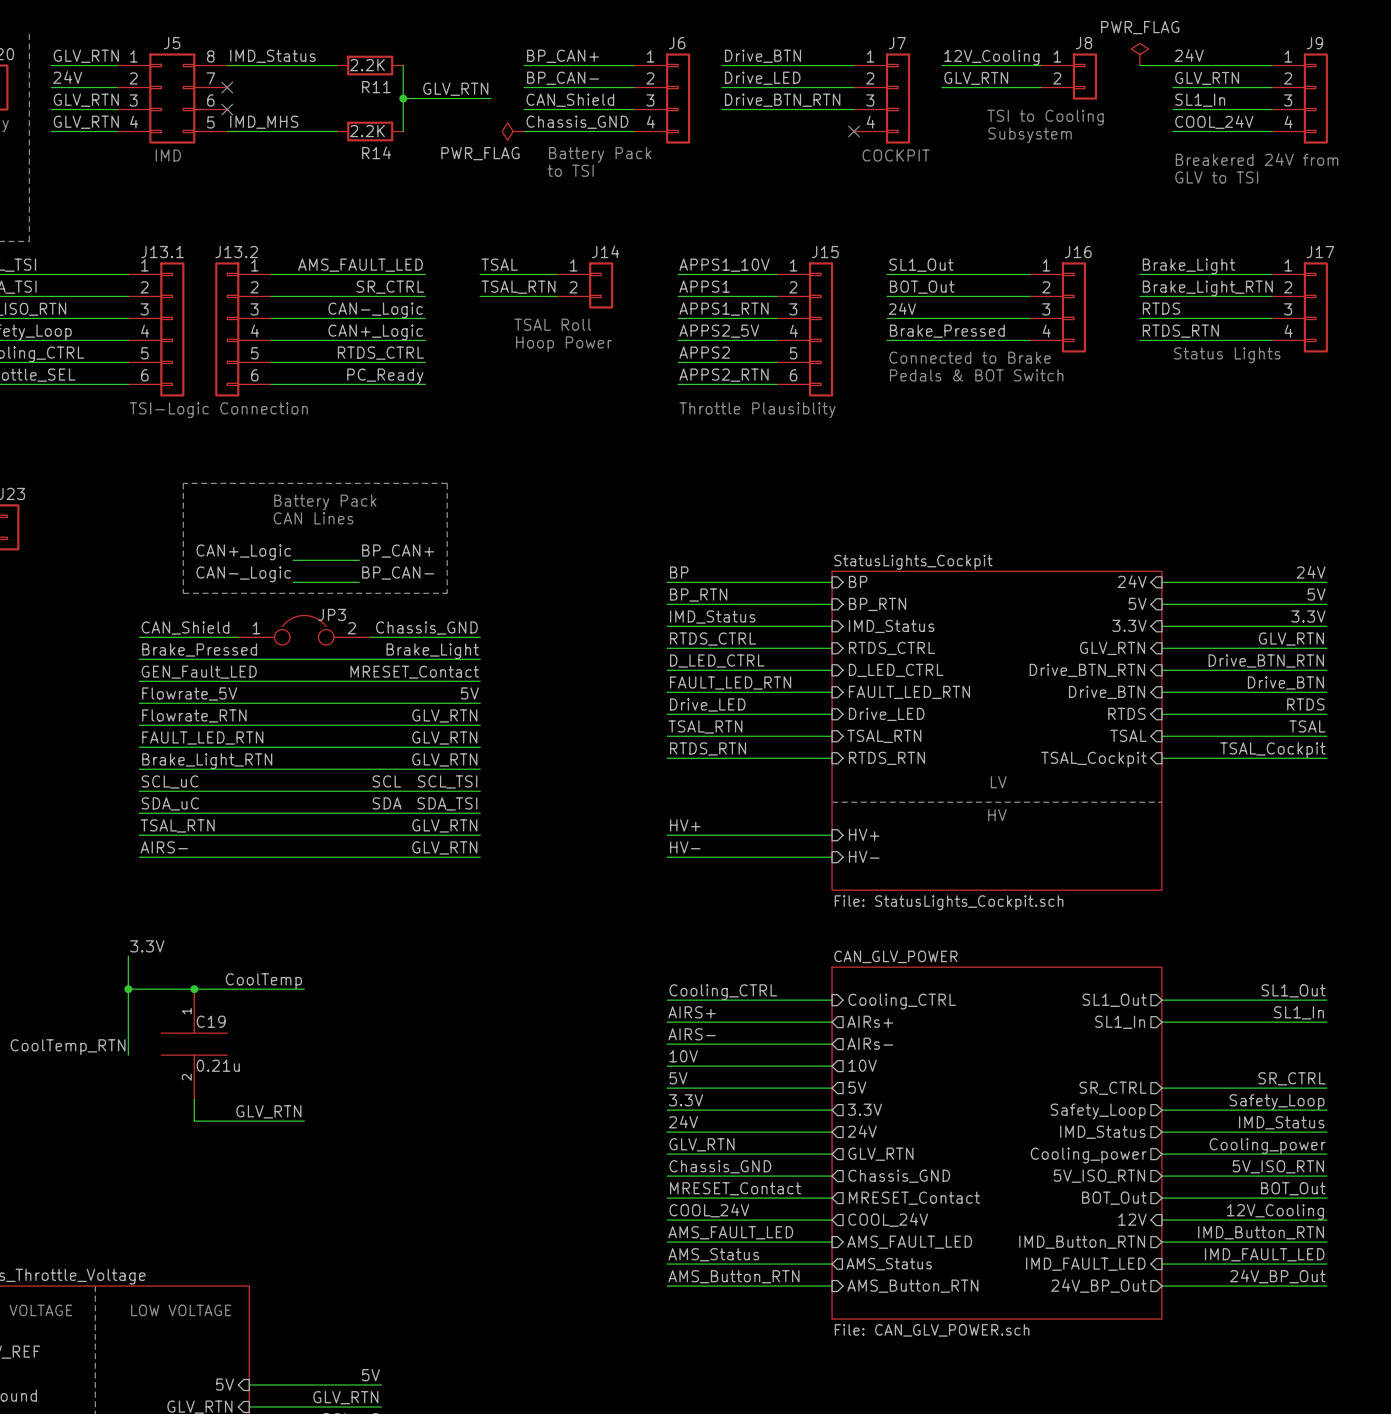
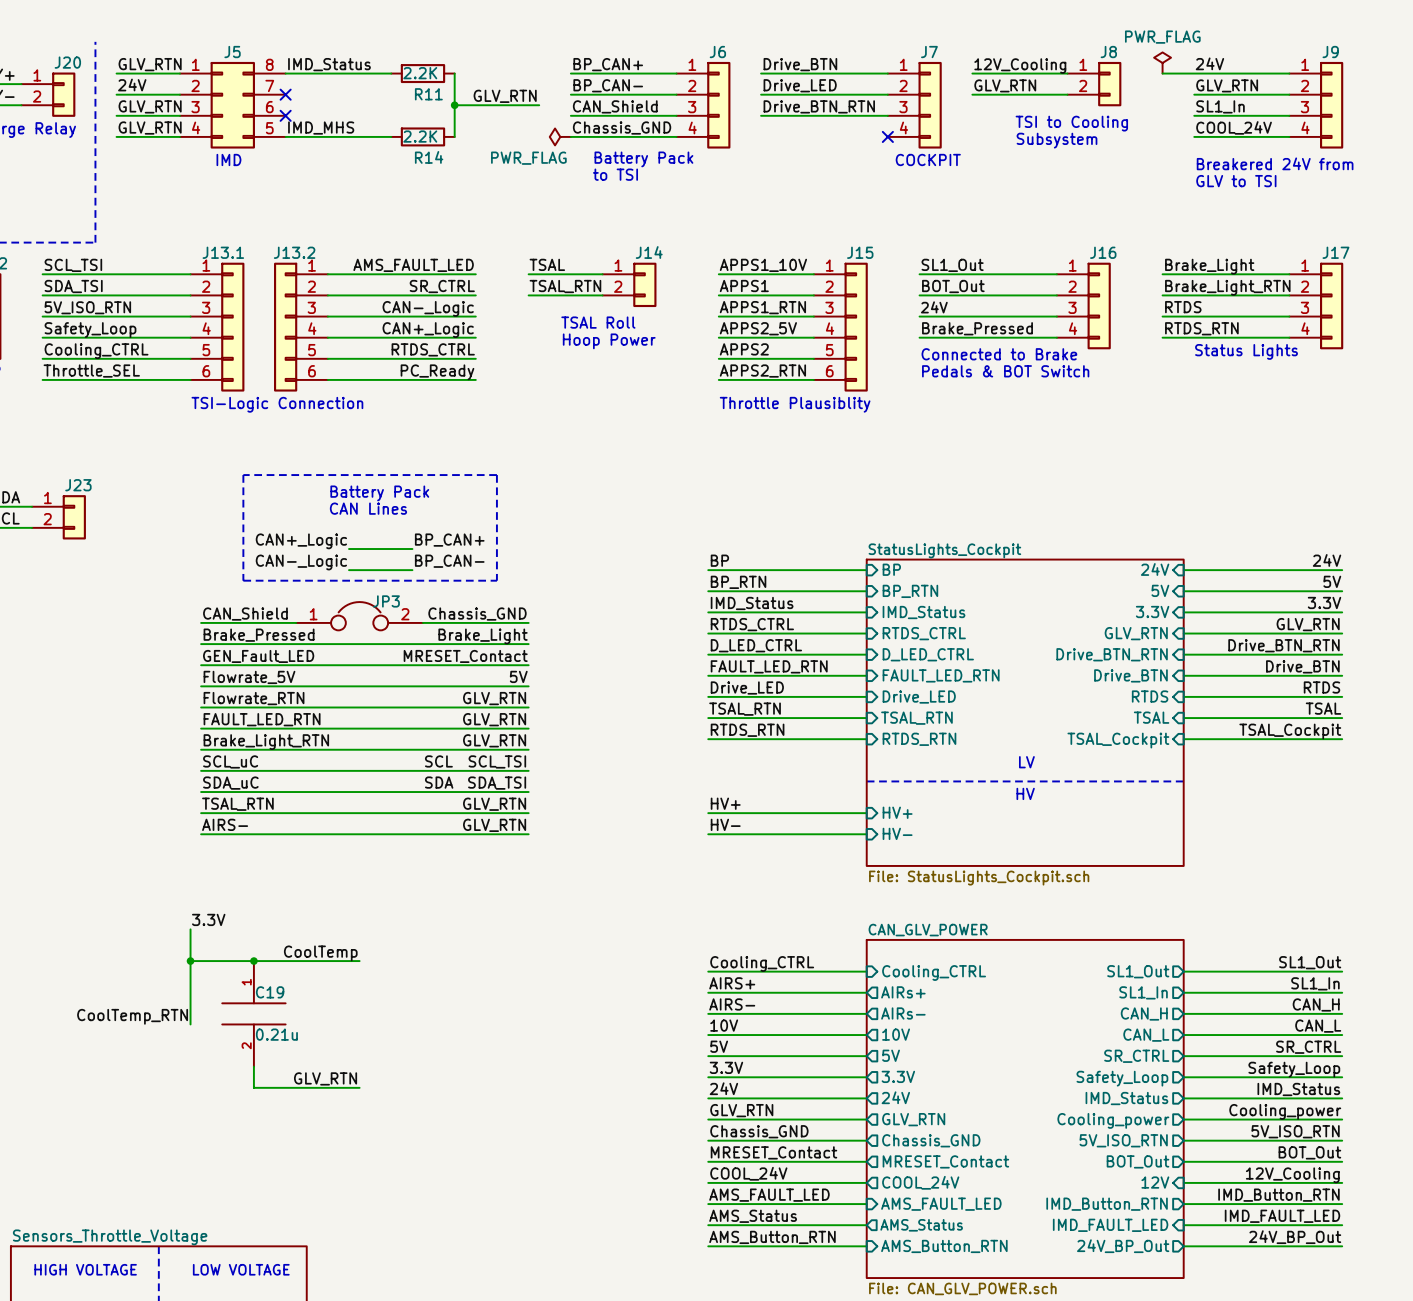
label: none -> CAN_H (1316, 1004)
sheet pin: none -> CAN_H (1144, 1014)
wire: none -> (1183, 1013) (1342, 1013)
label: none -> CAN_L (1318, 1026)
sheet pin: none -> CAN_L (1146, 1035)
wire: none -> (1183, 1035) (1342, 1035)

